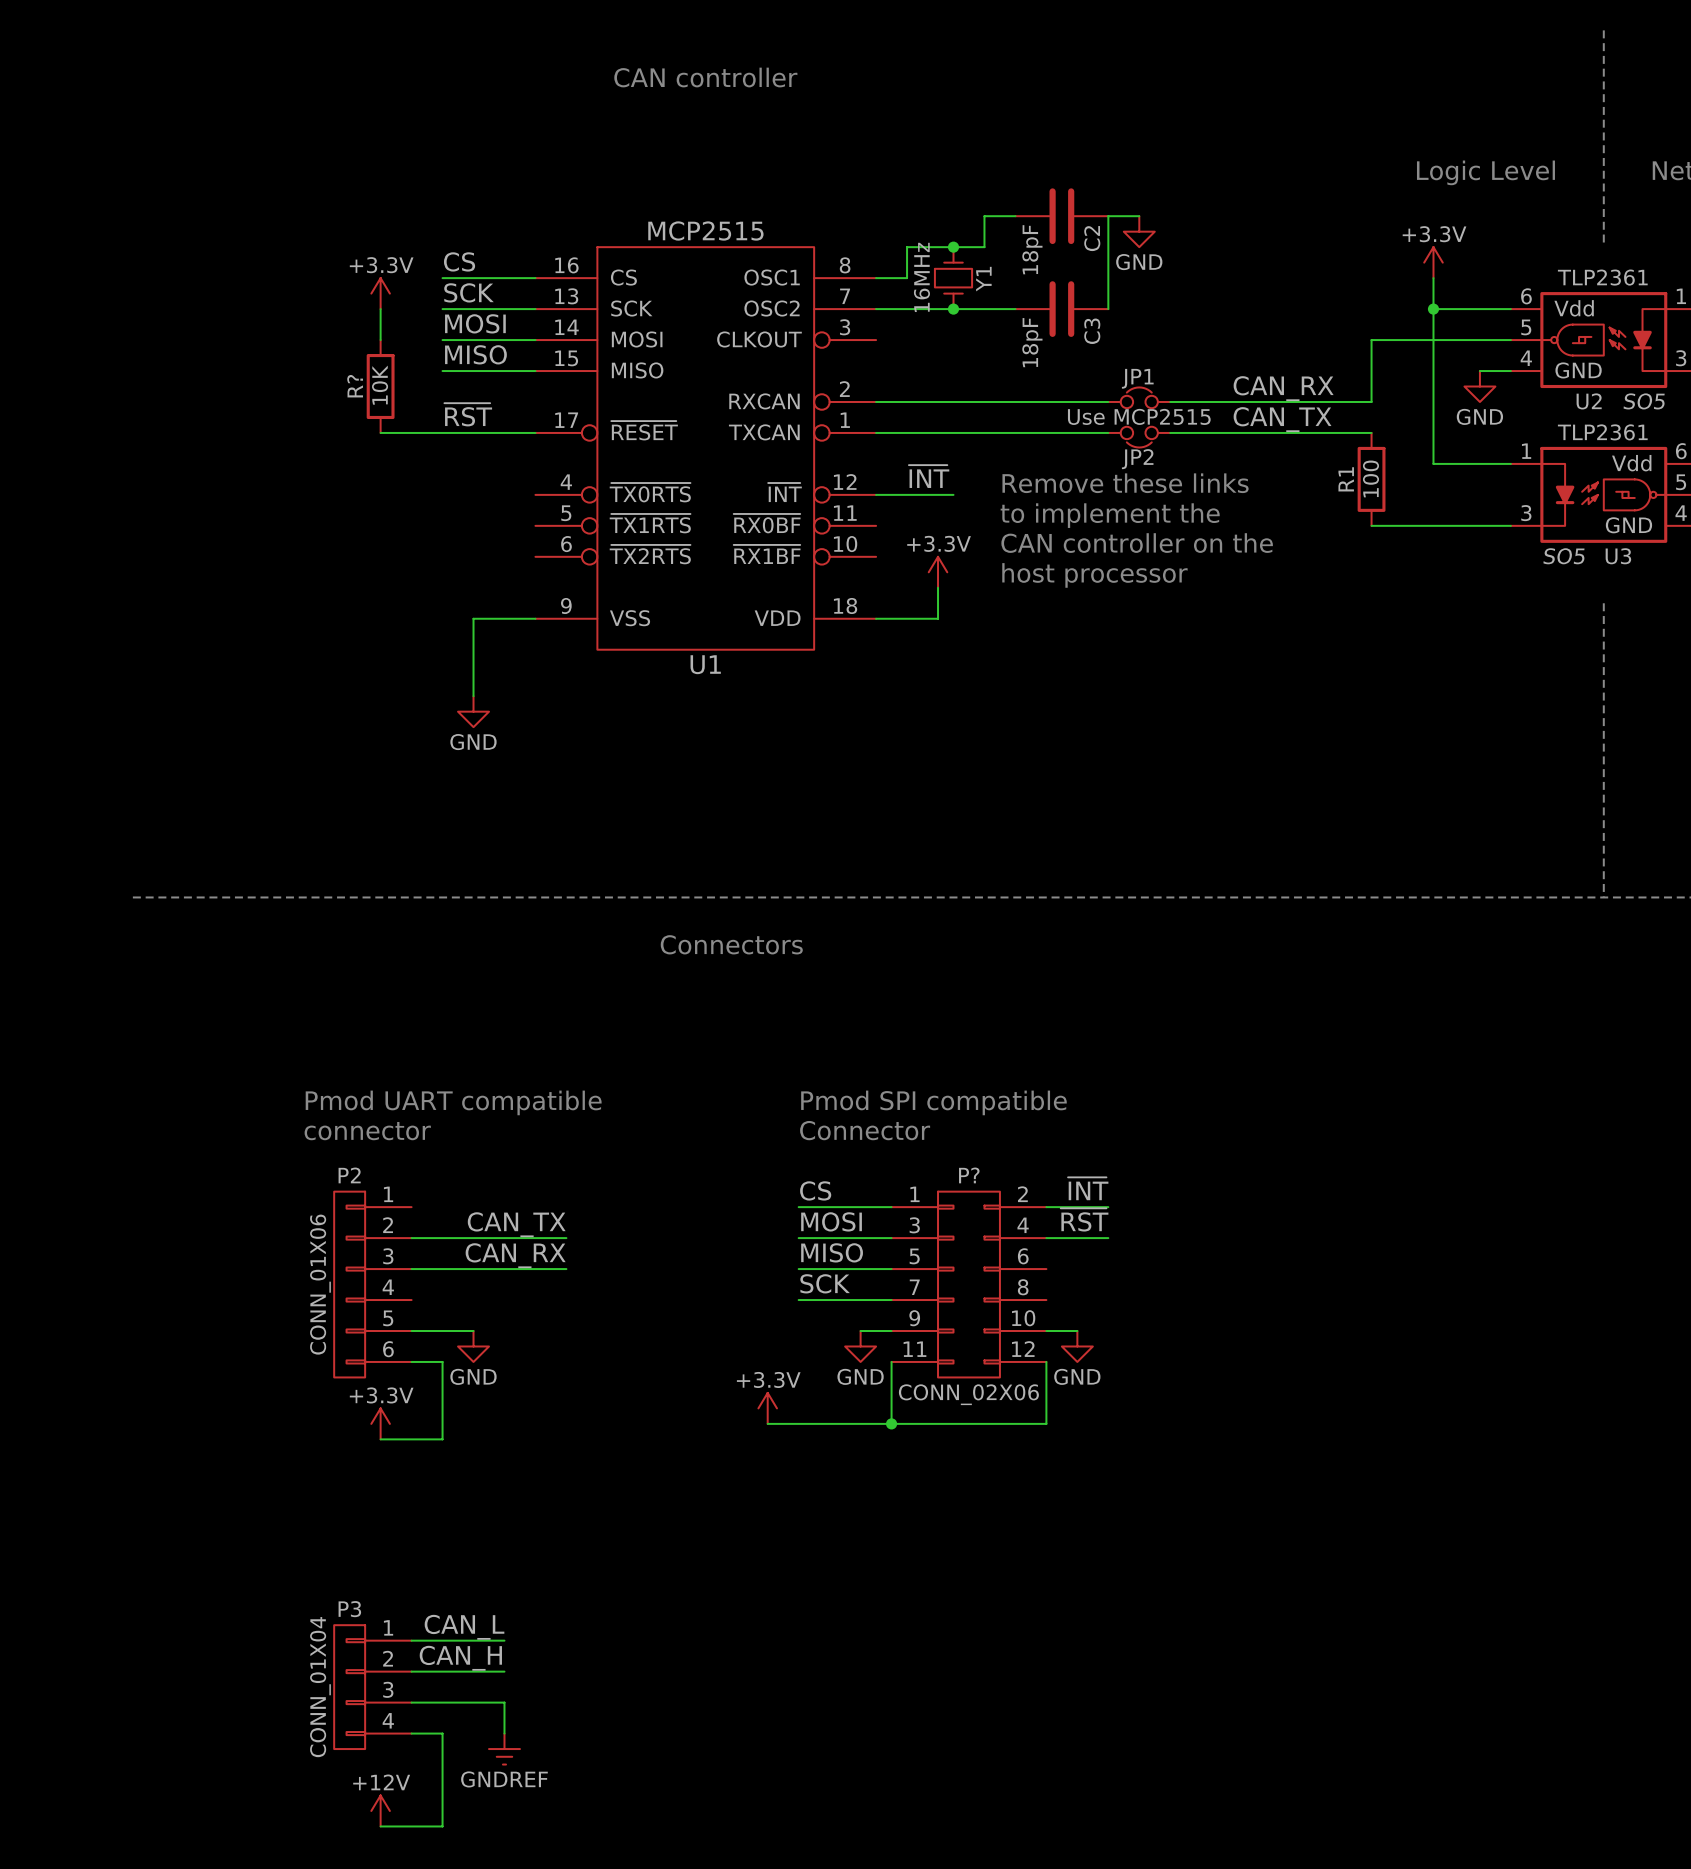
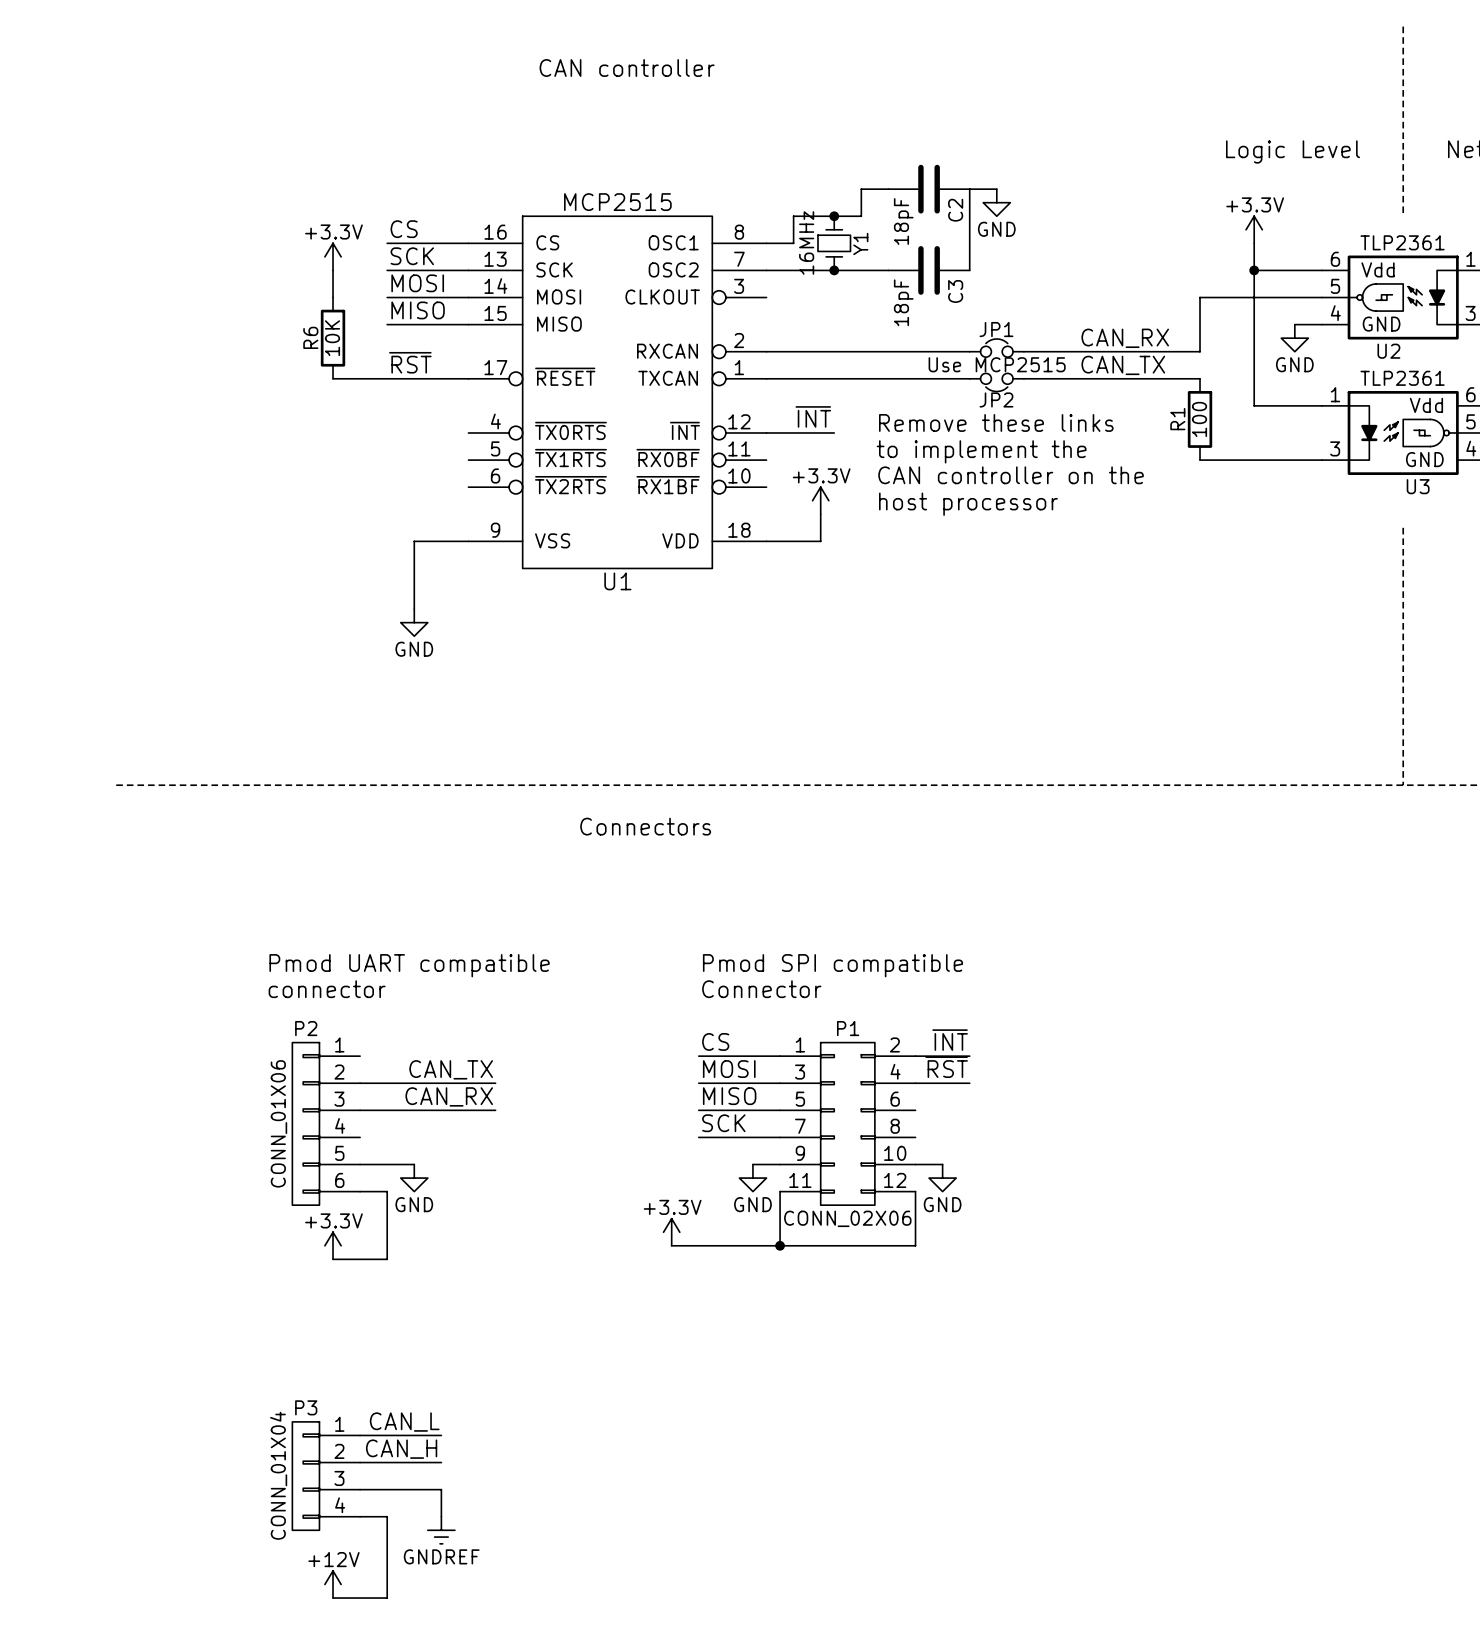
R? name: R? (355, 386) -> R6 (310, 337)
U2 text: SO5 (1644, 401) -> none
U3 text: SO5 (1564, 556) -> none
P? name: P? (969, 1175) -> P1 (848, 1028)

